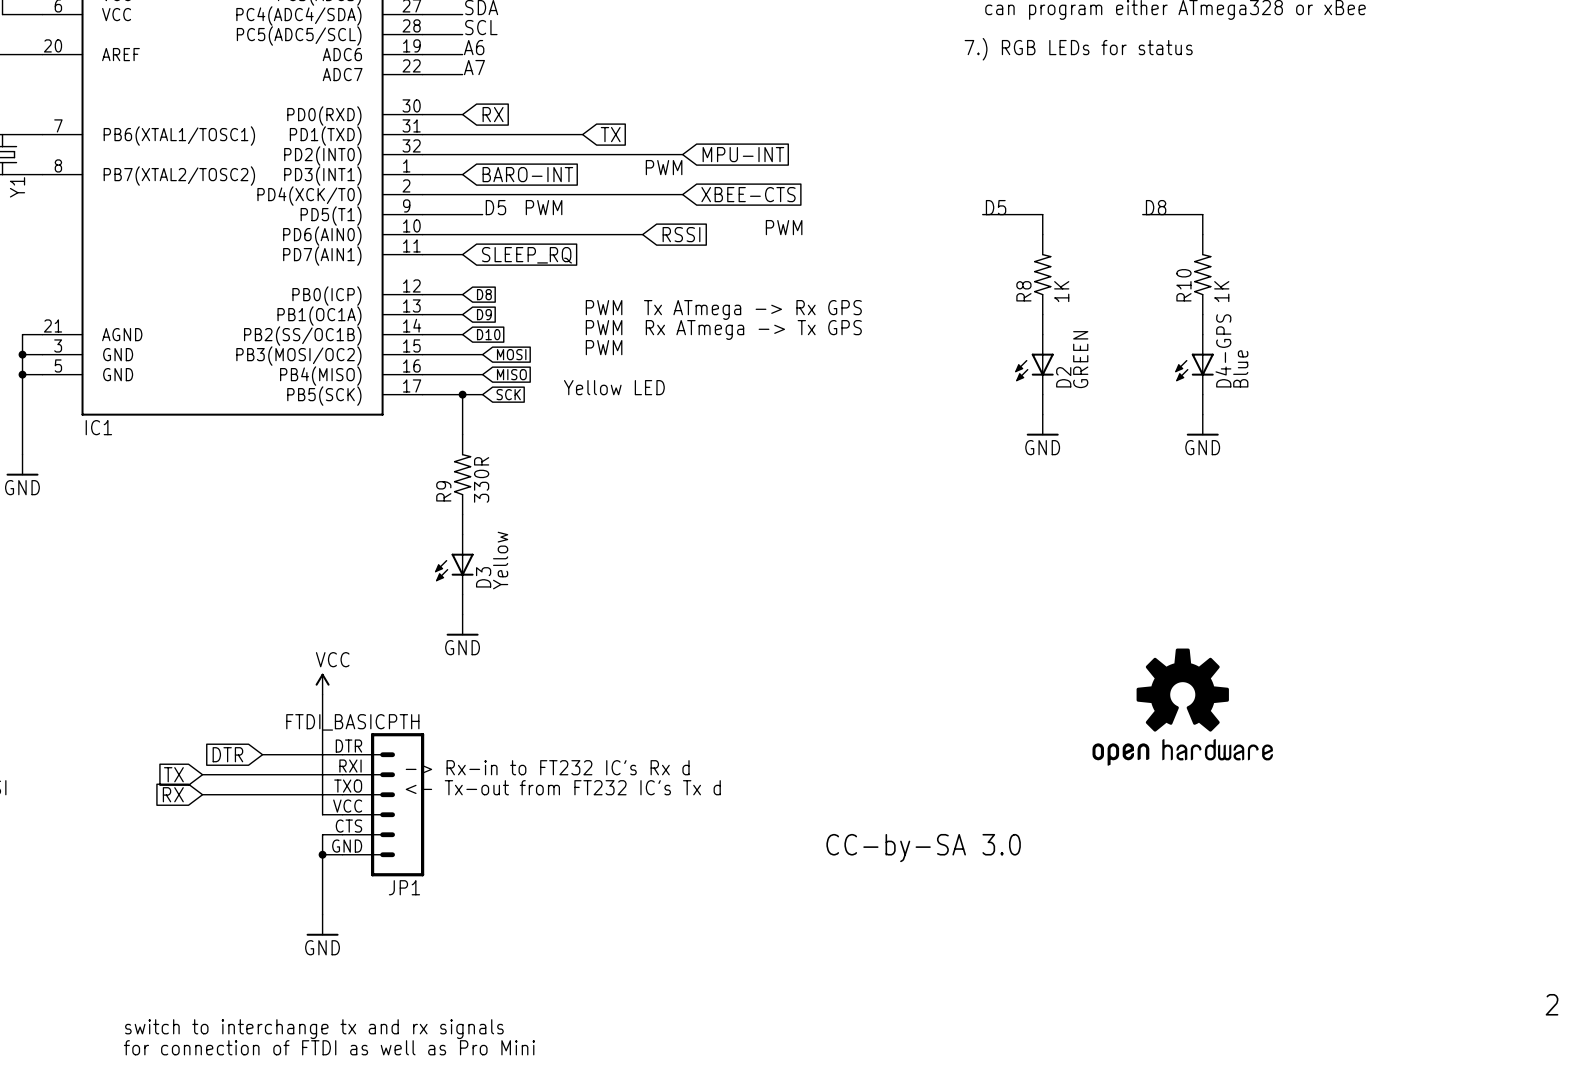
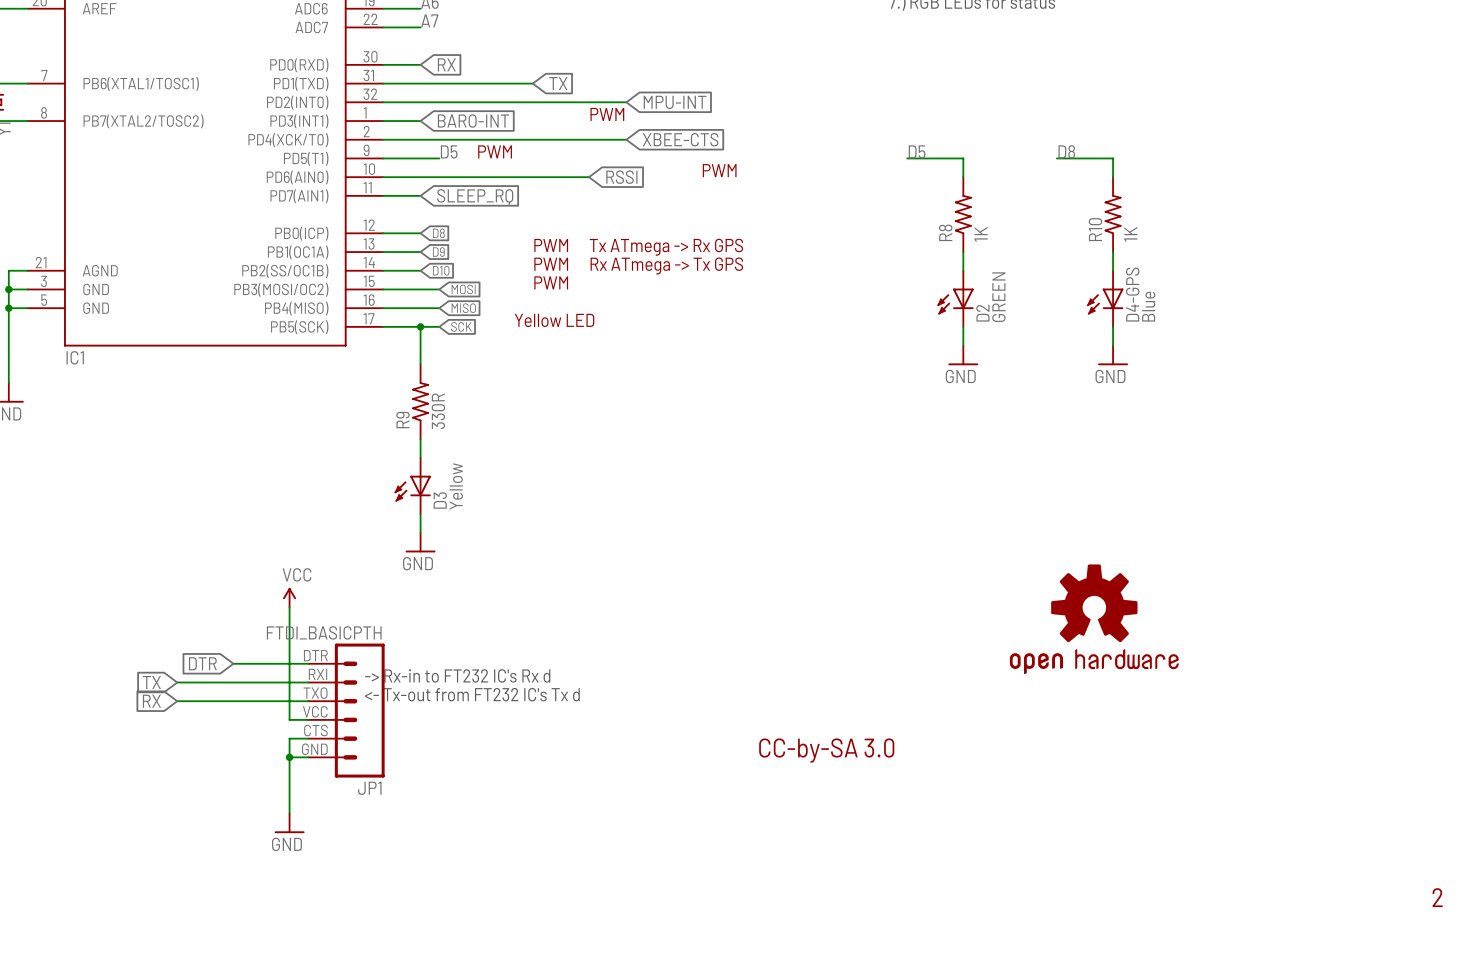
text: switch to interchange tx and rx signals (314, 1029) -> none
text: for connection of FTDI as well as Pro Mini (329, 1047) -> none

